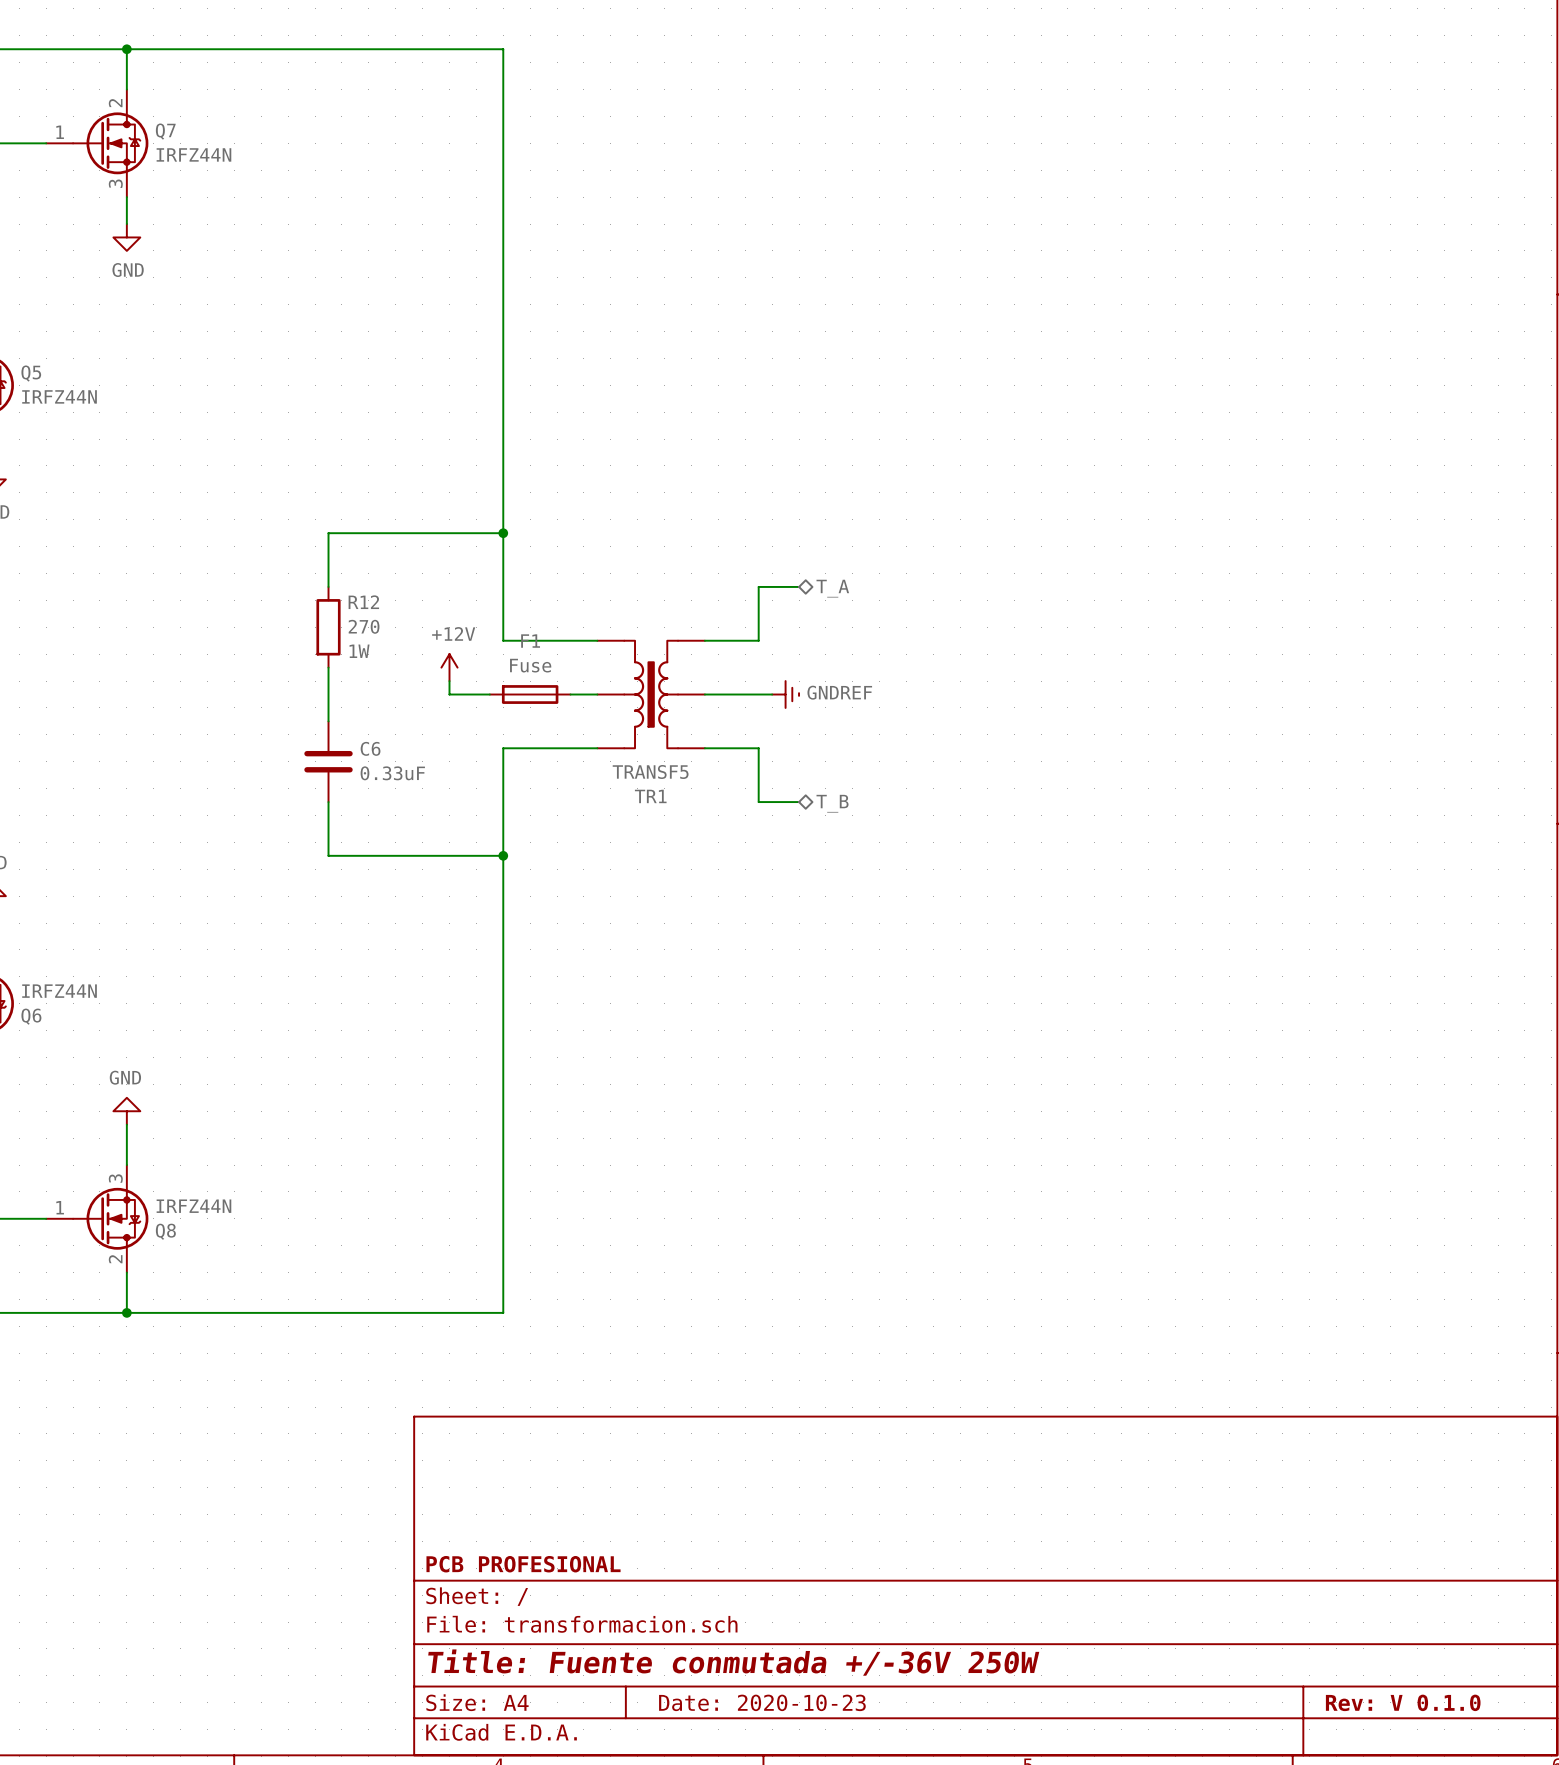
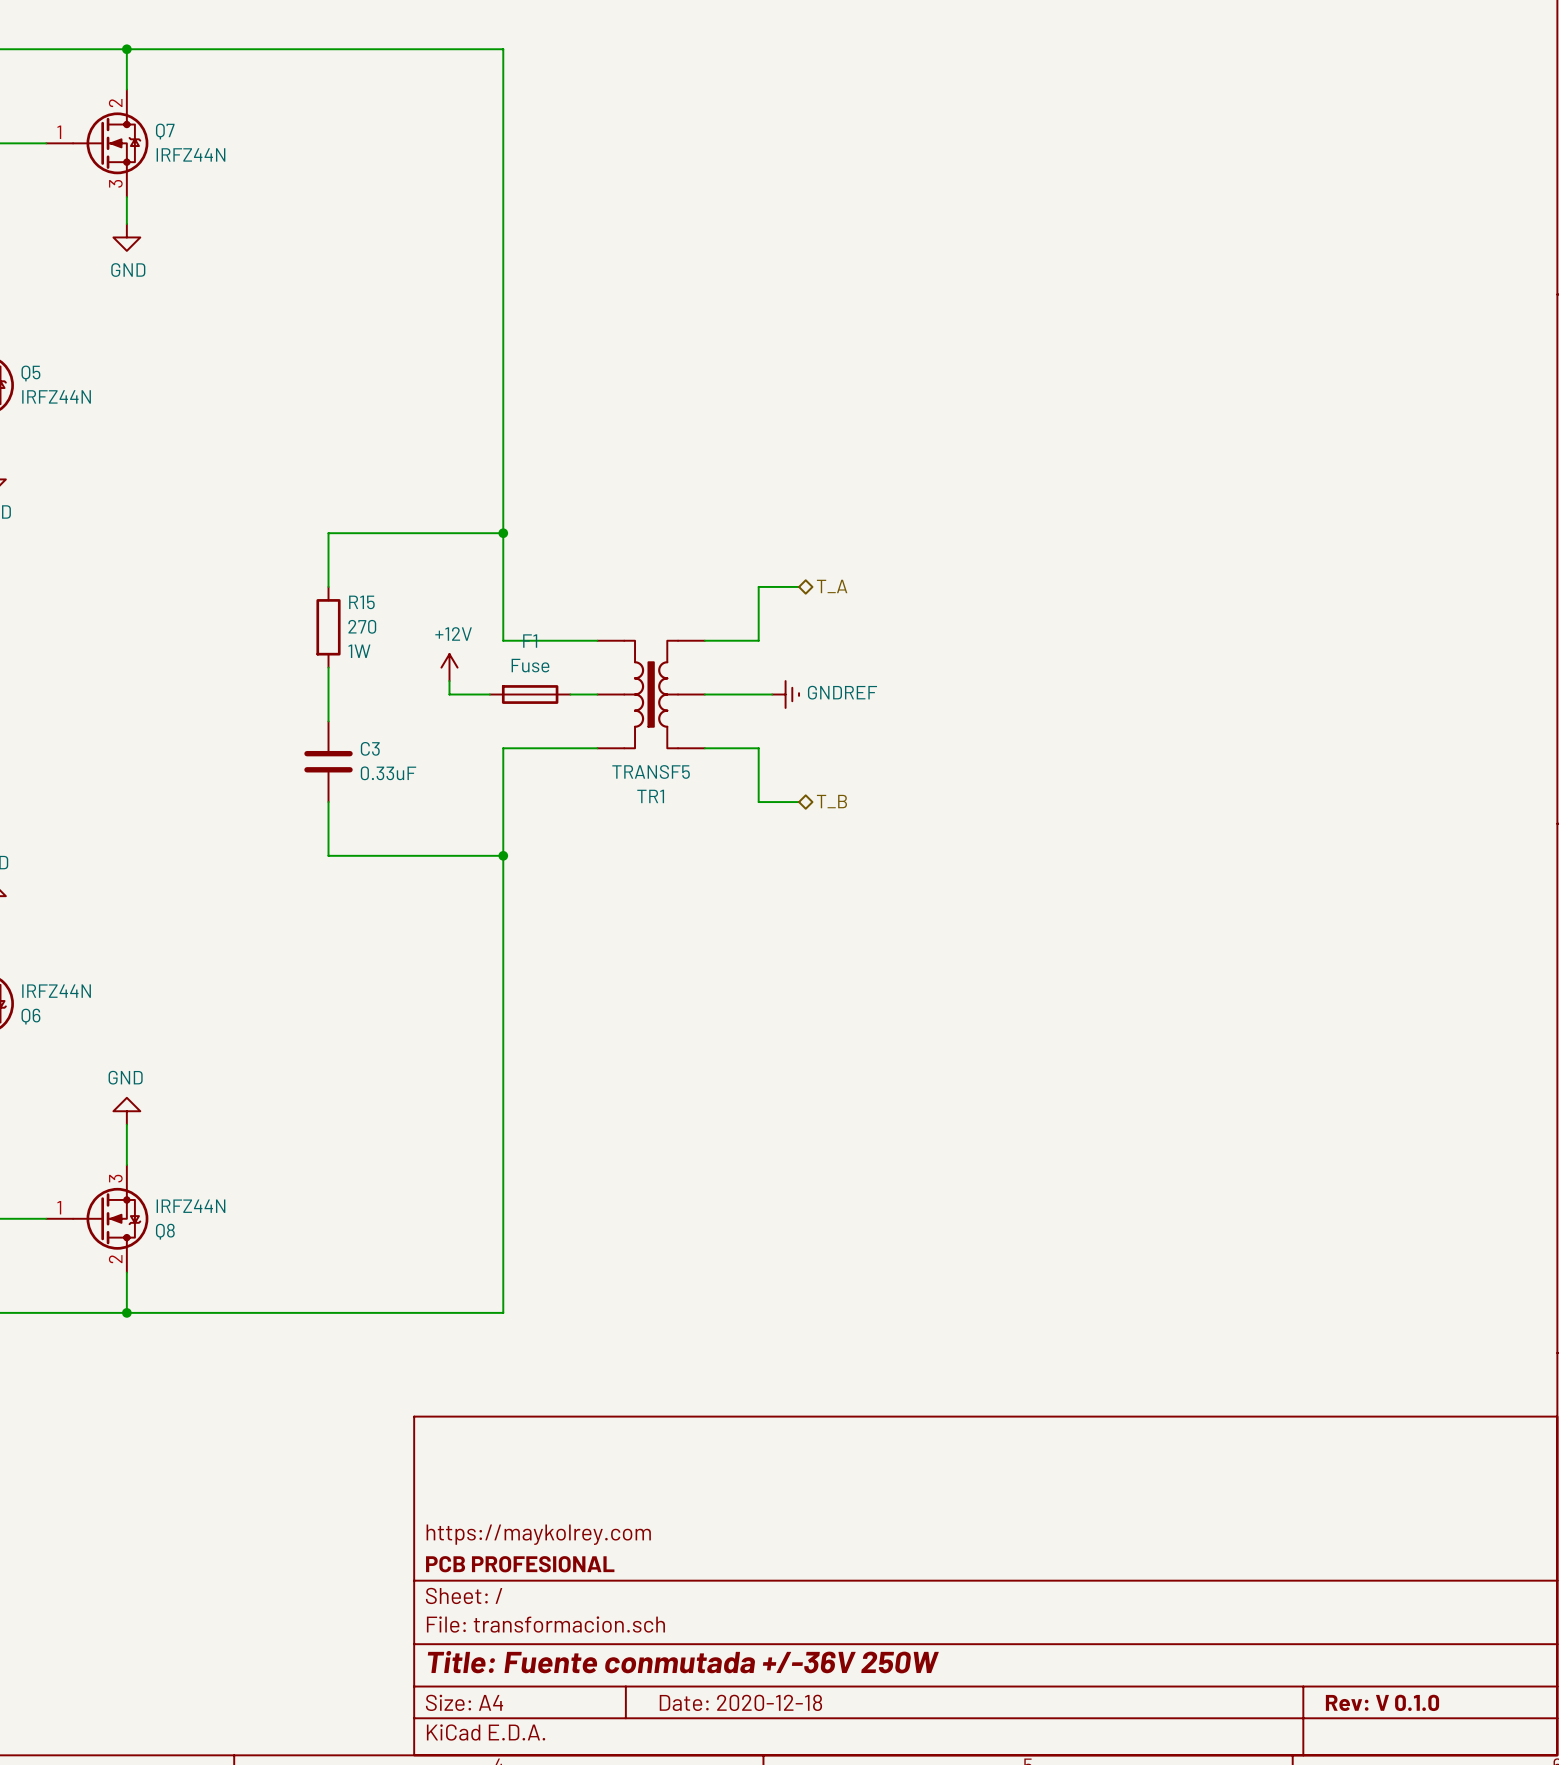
R12 name: R12 (363, 602) -> R15 (361, 602)
C6 name: C6 (370, 748) -> C3 (370, 748)
title block: none -> https://maykolrey.com (538, 1534)
title block: Date: 2020-10-23 (762, 1702) -> Date: 2020-12-18 (740, 1702)

